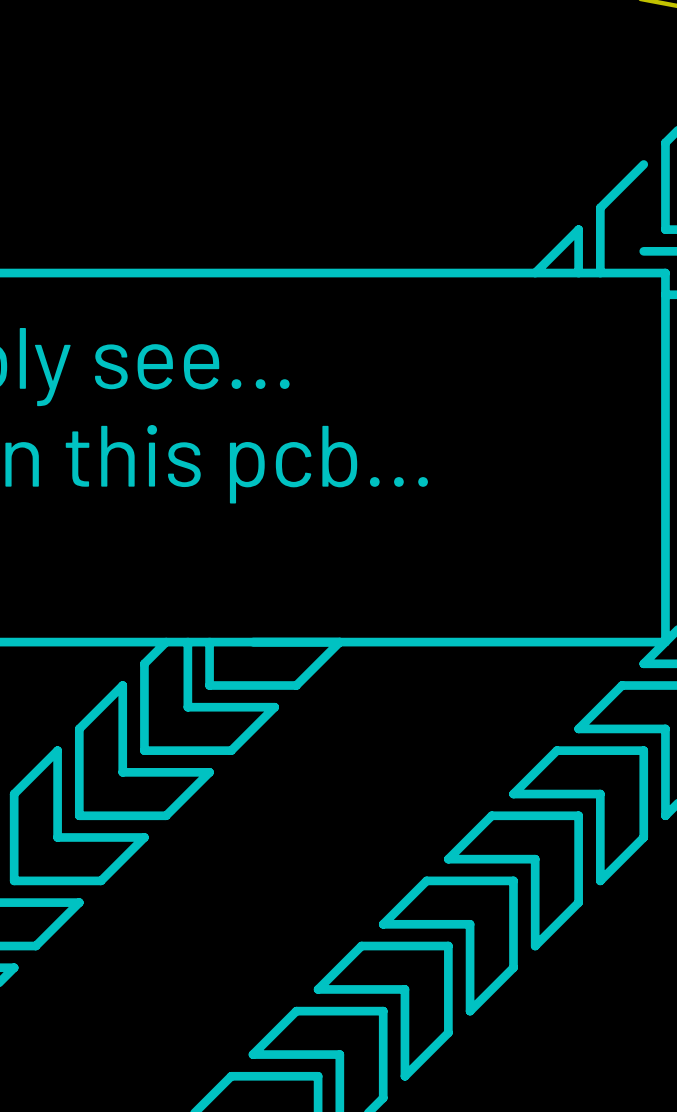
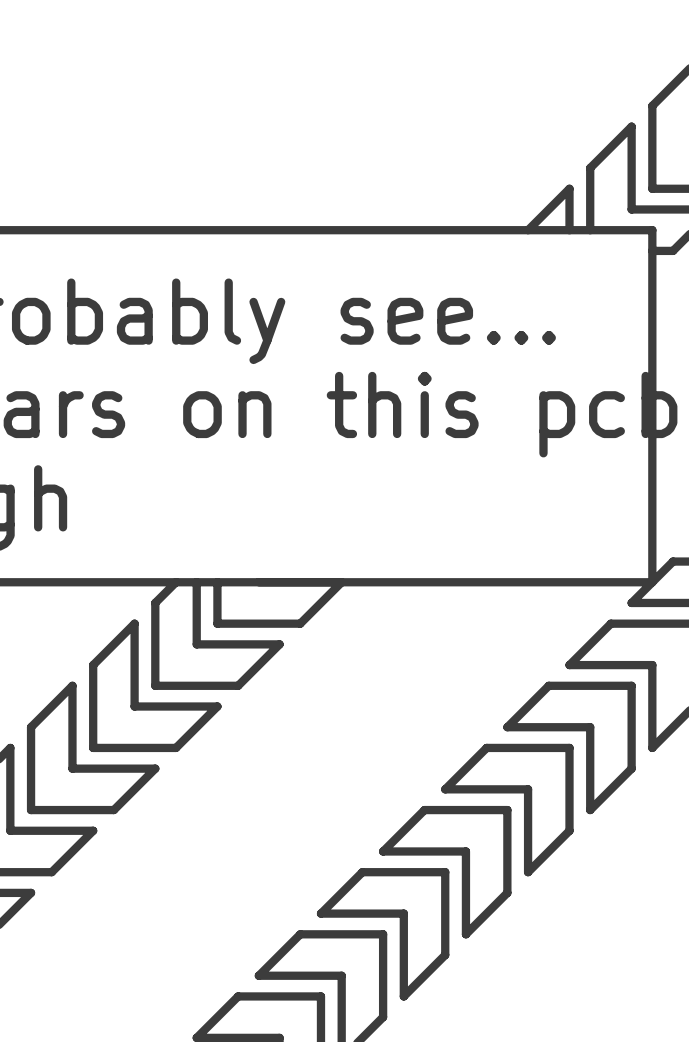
line: none -> (631, 126) (631, 209)

